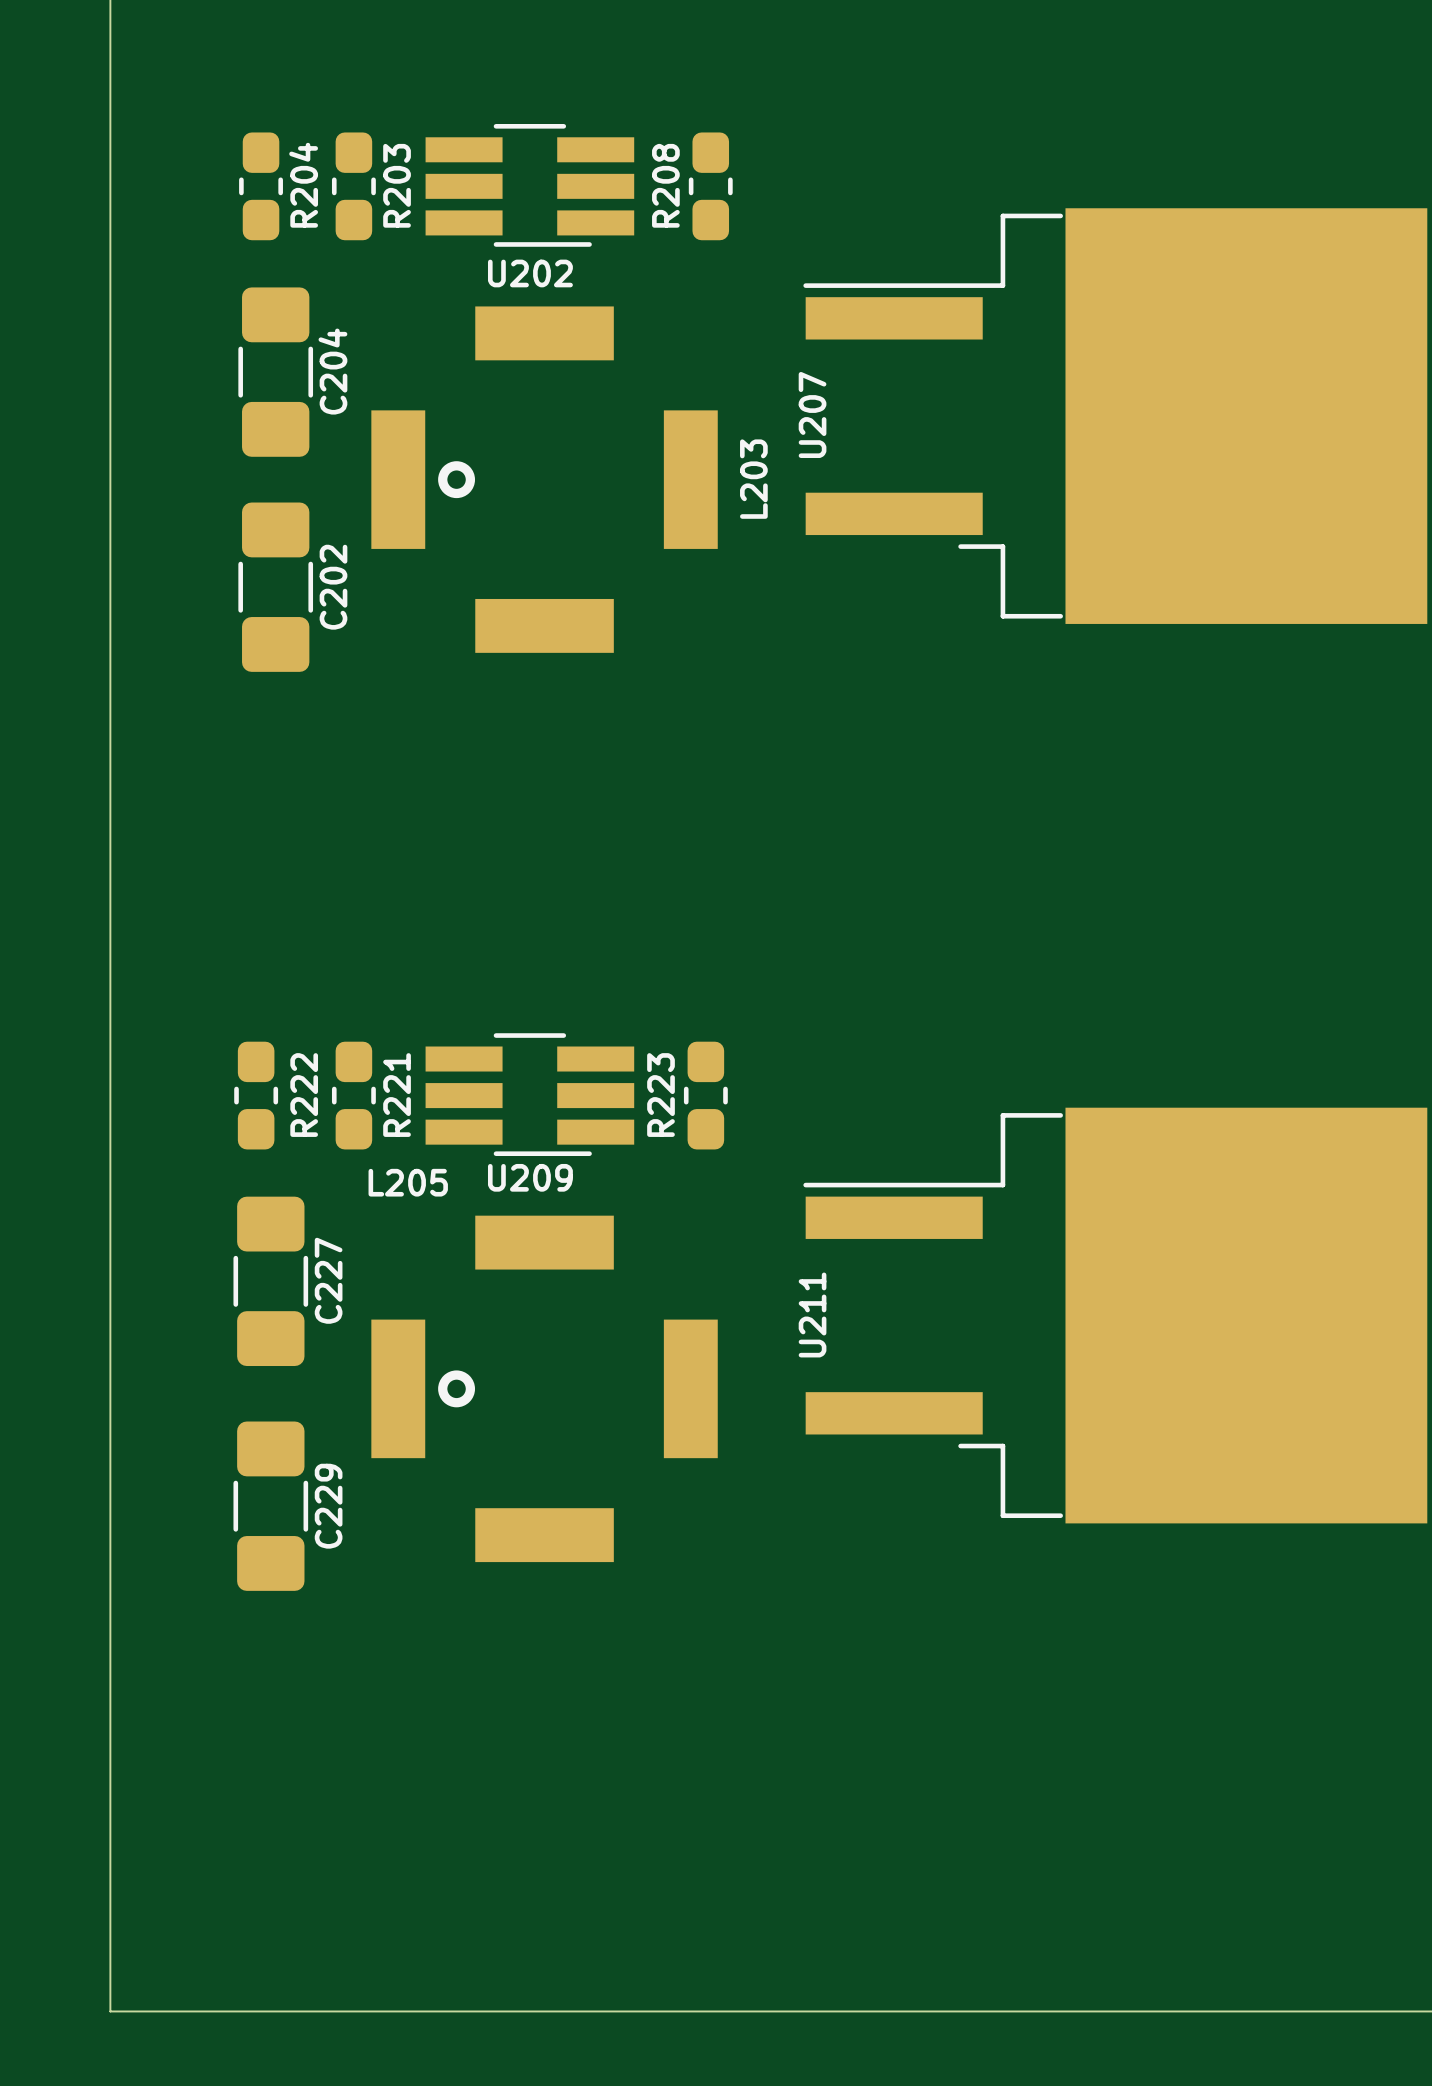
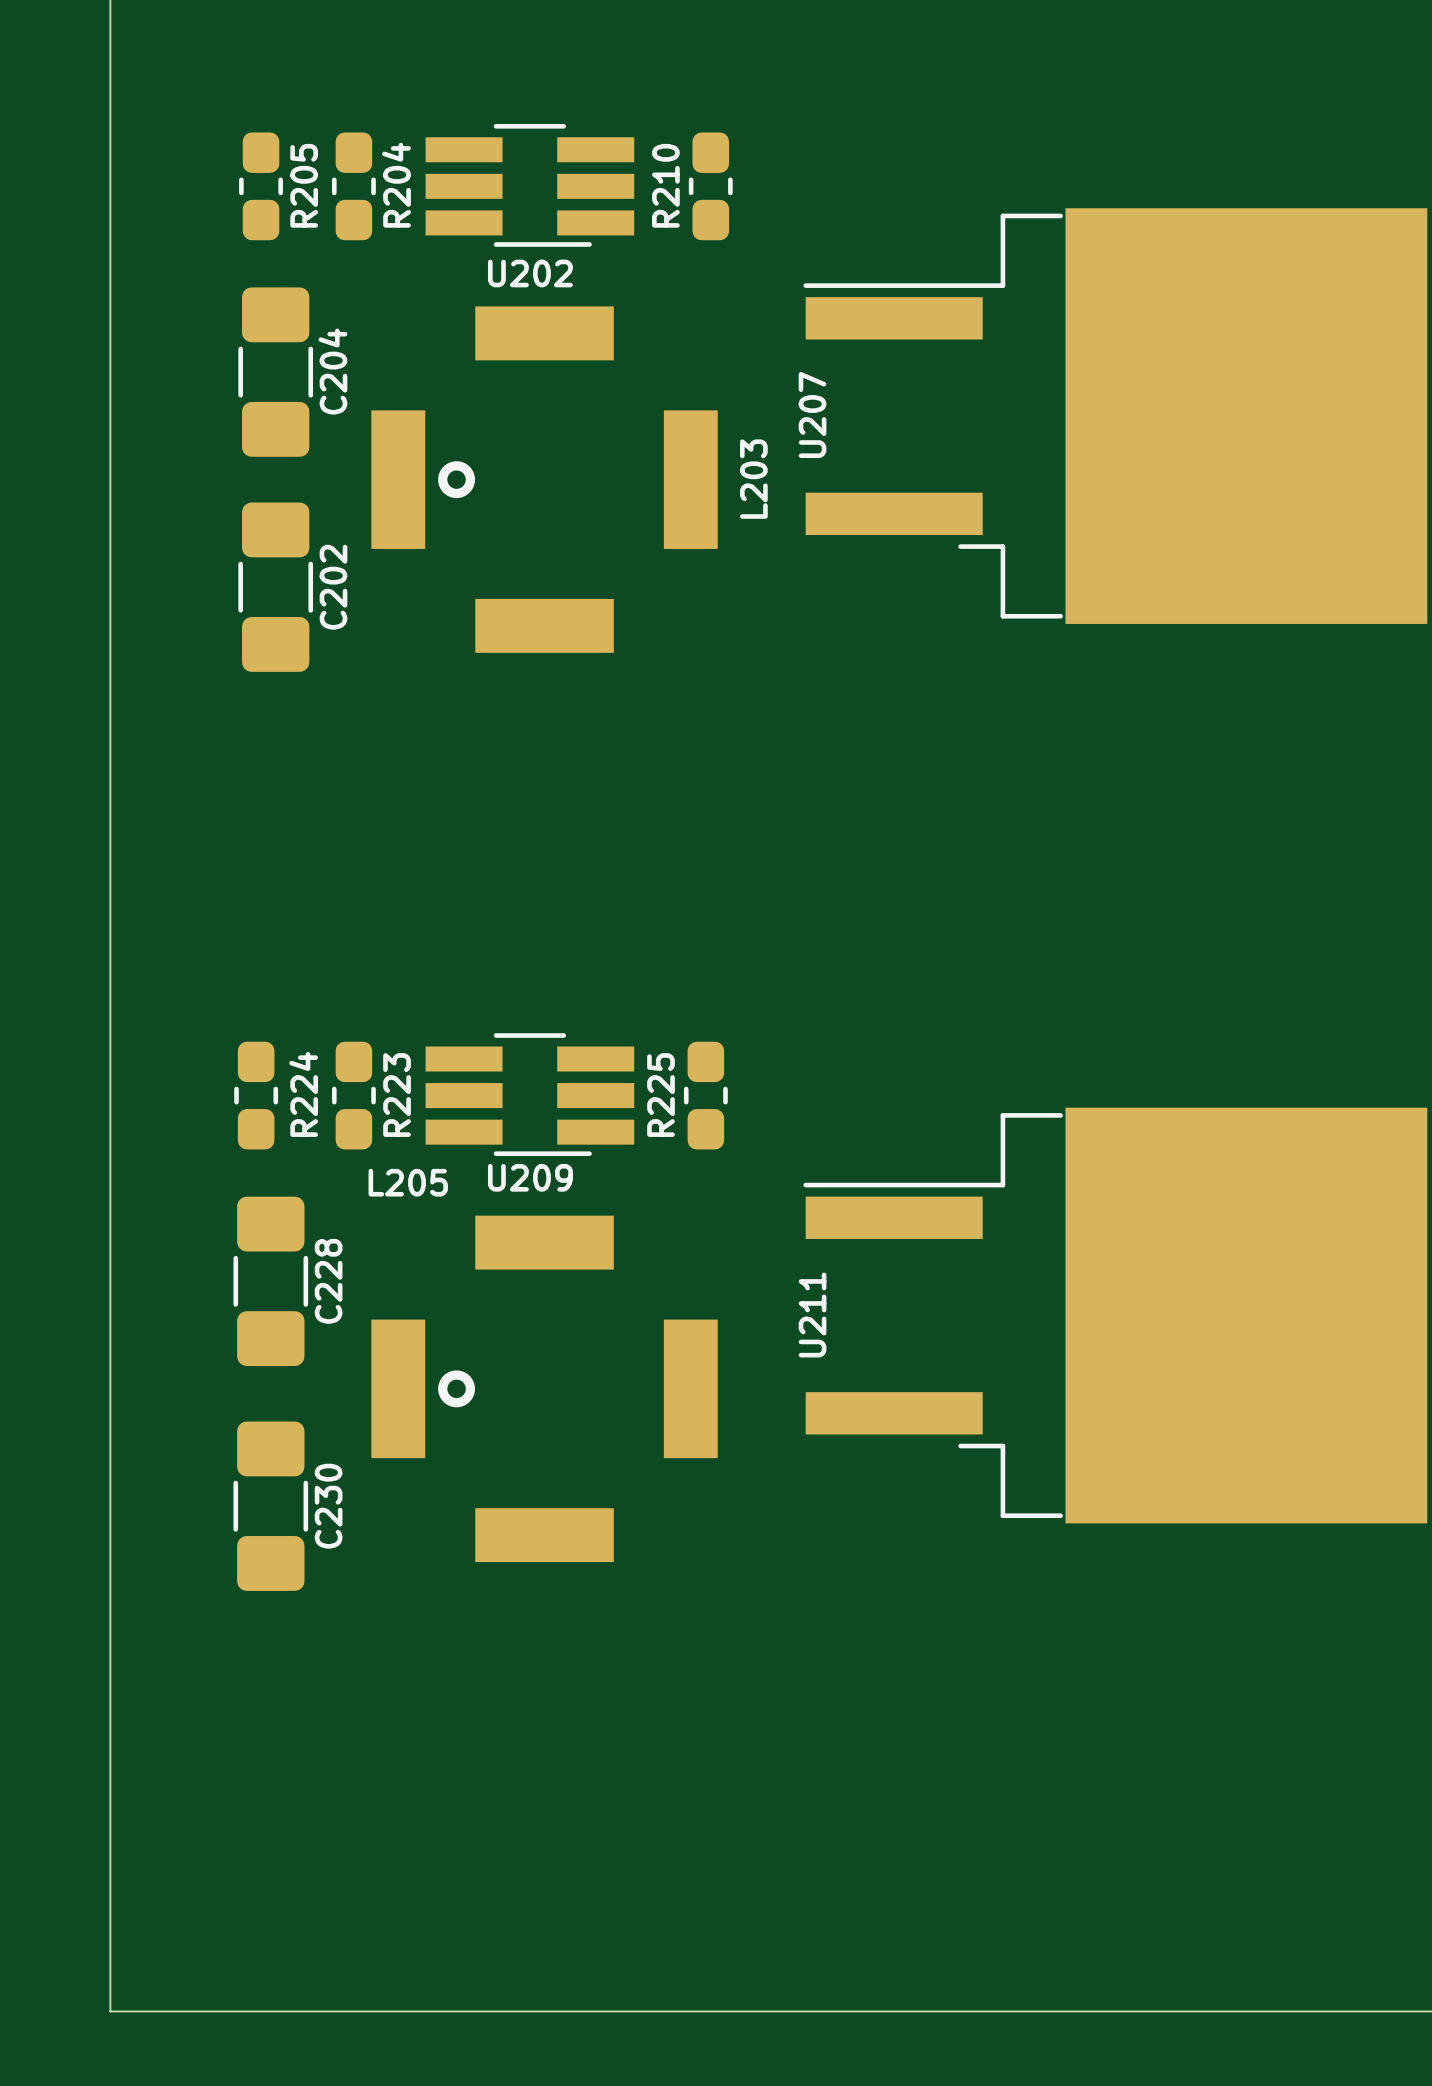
R204 name: R204 (303, 185) -> R205 (304, 185)
R203 name: R203 (397, 185) -> R204 (396, 185)
R208 name: R208 (665, 185) -> R210 (665, 185)
R222 name: R222 (304, 1095) -> R224 (303, 1094)
R221 name: R221 (397, 1095) -> R223 (397, 1095)
R223 name: R223 (661, 1095) -> R225 (661, 1095)
C227 name: C227 (328, 1280) -> C228 (328, 1281)
C229 name: C229 (328, 1506) -> C230 (328, 1506)

